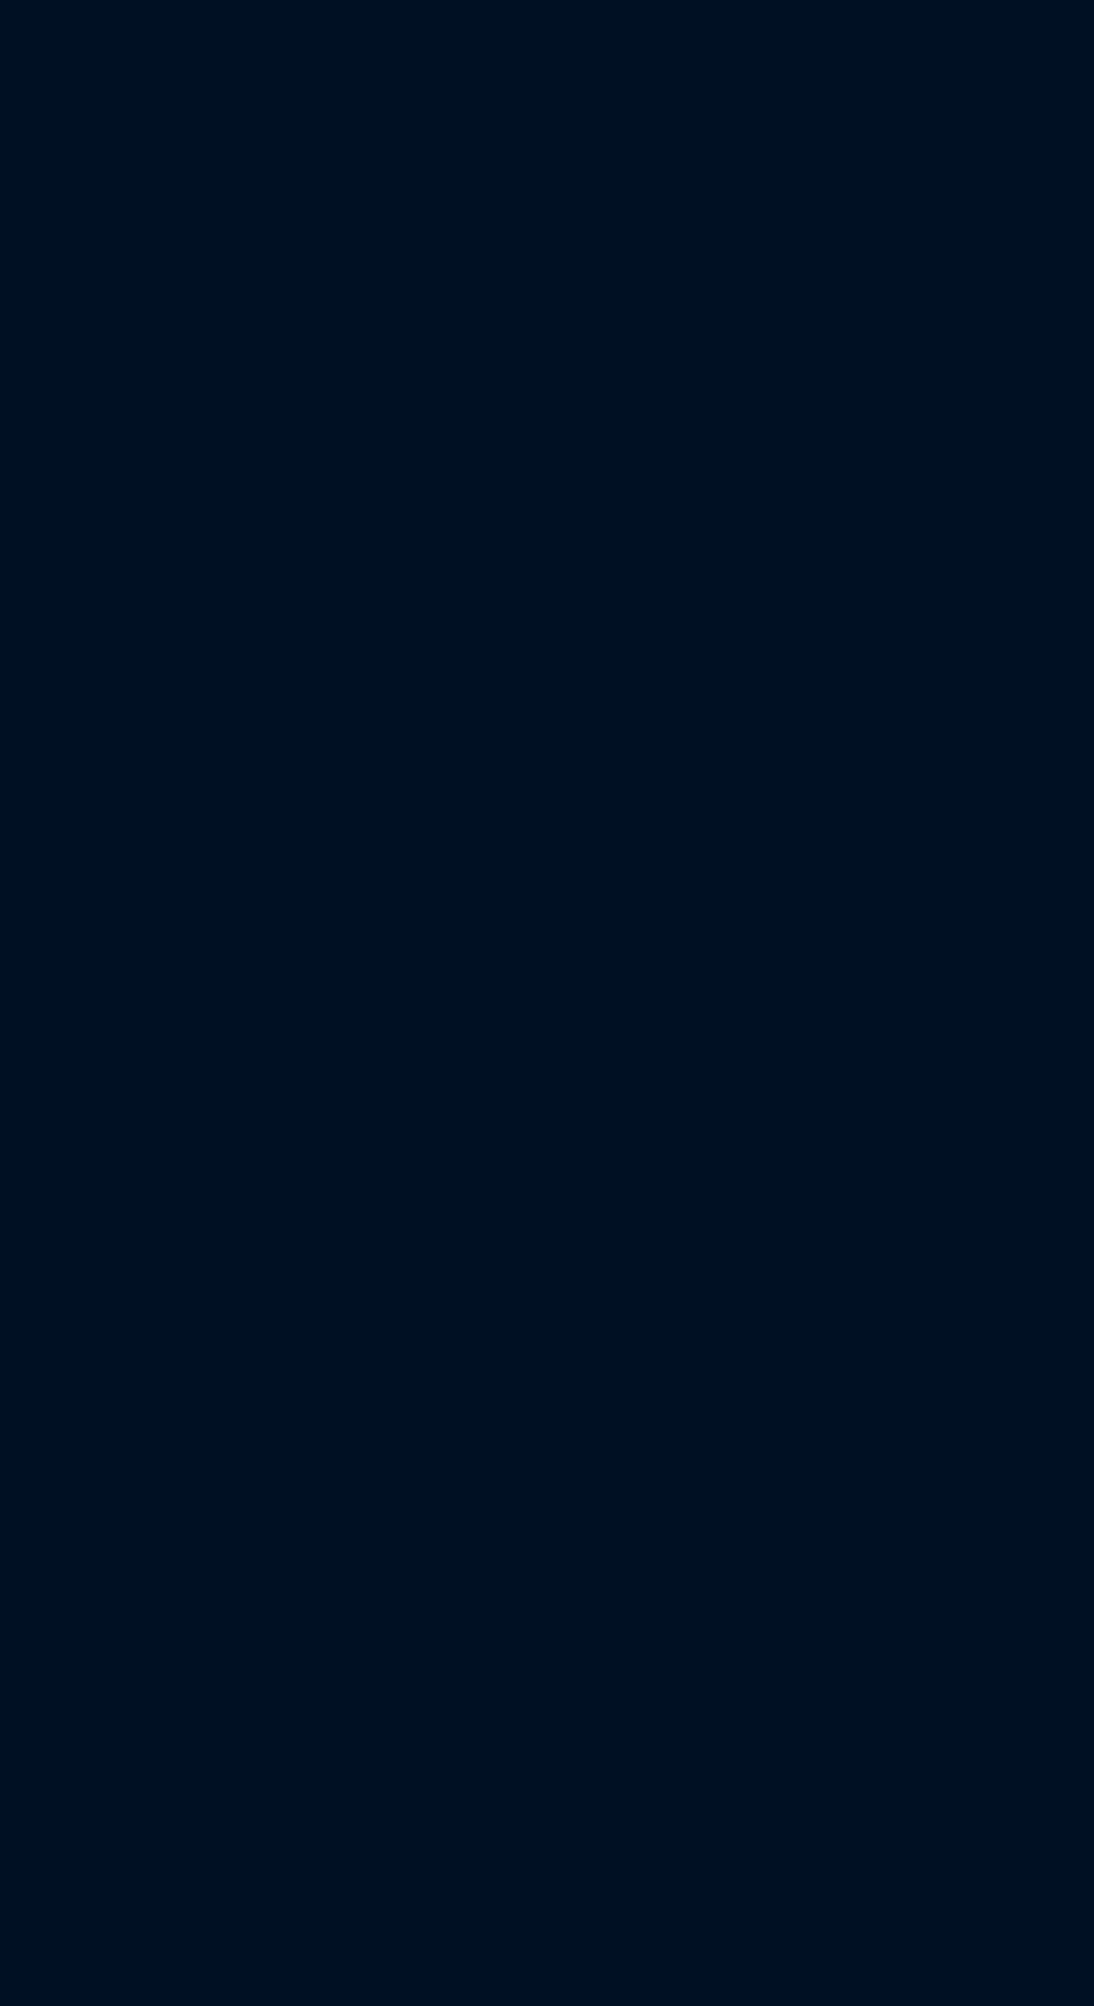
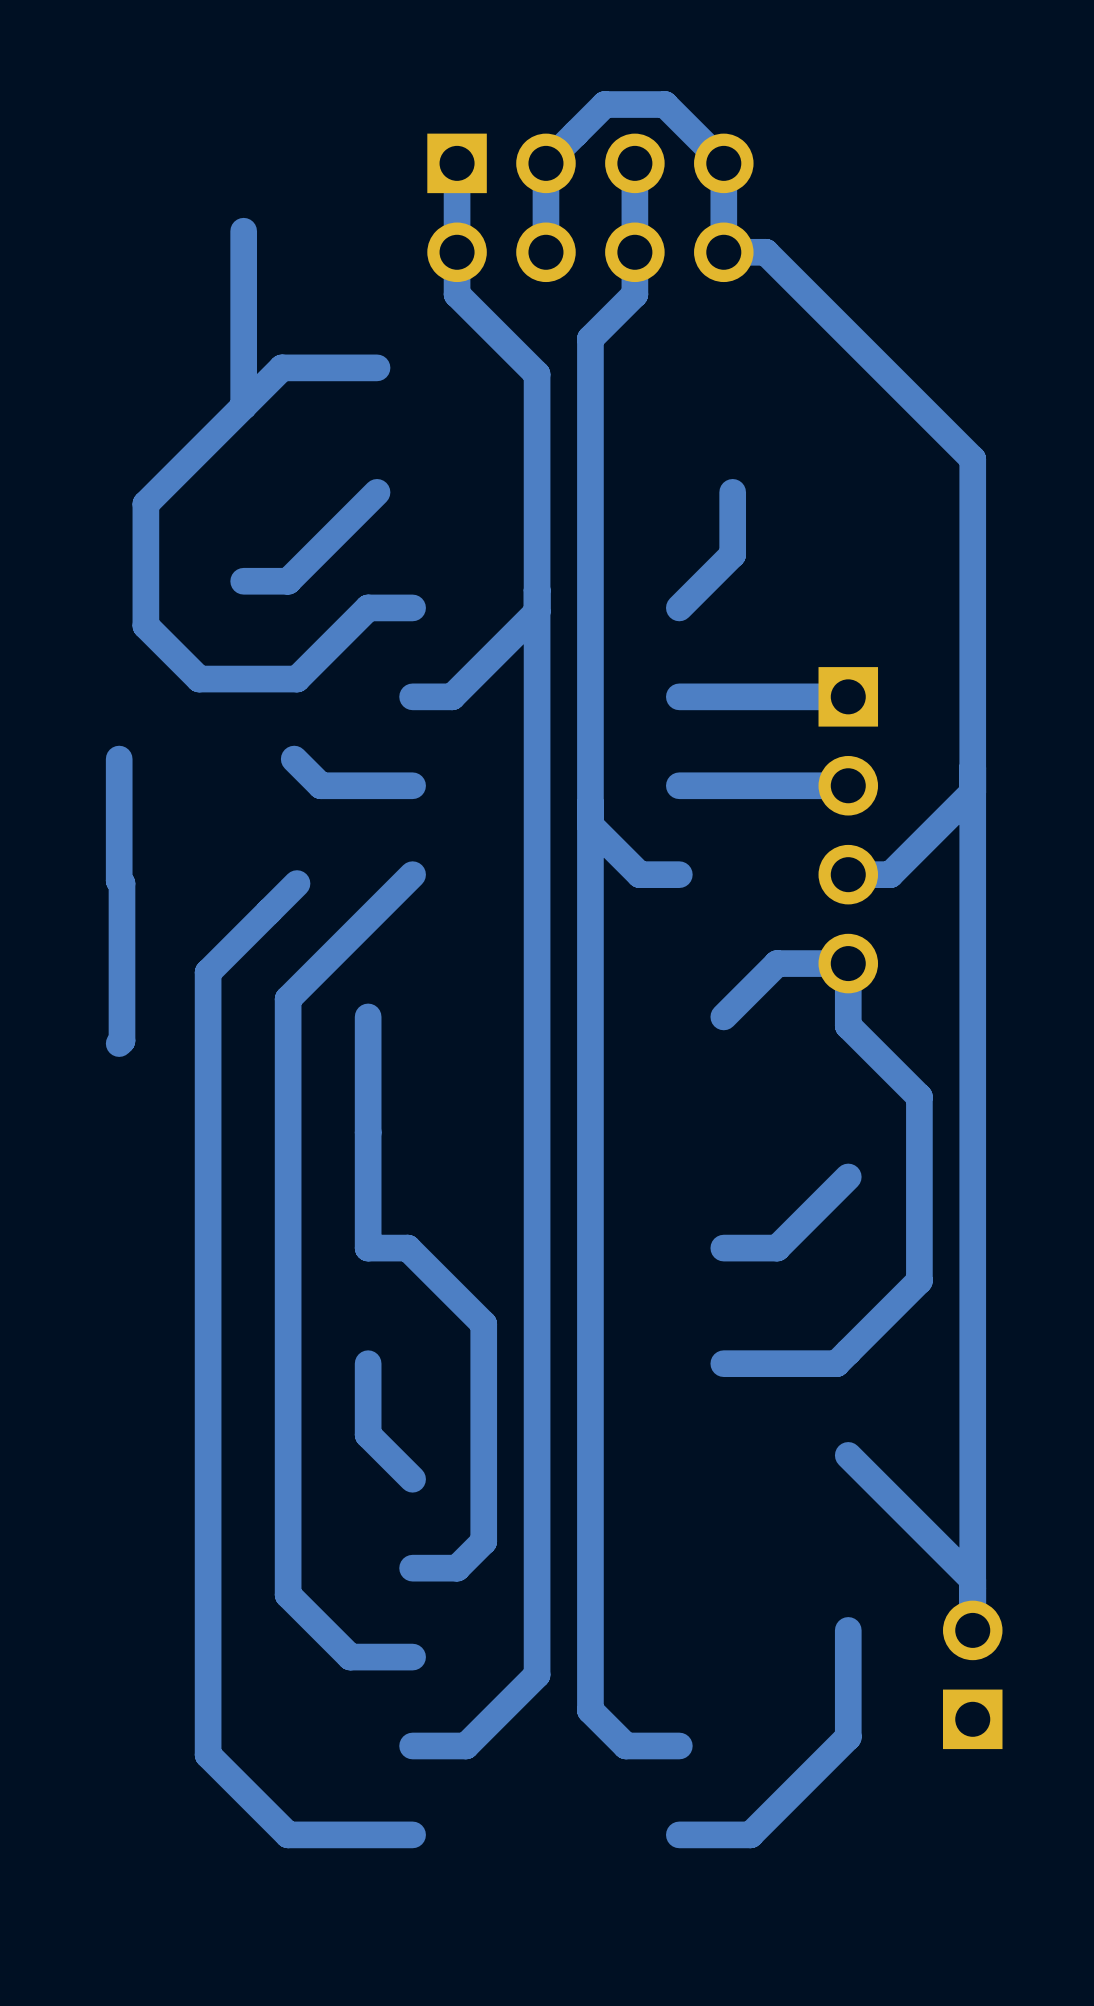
track: none -> (457, 163) (457, 294) (537, 374) (537, 1674) (465, 1745) (412, 1745)
track: none -> (634, 163) (634, 294) (590, 338) (590, 1710) (625, 1745) (679, 1745)
part: none -> (590, 207)
track: none -> (243, 231) (243, 406)
track: none -> (545, 252) (545, 163) (604, 104) (664, 104) (723, 163) (723, 252) (765, 252) (972, 459) (972, 1630)
track: none -> (377, 367) (282, 367) (145, 504) (145, 625) (199, 679) (297, 679) (368, 607) (412, 607)
track: none -> (377, 492) (288, 581) (243, 581)
track: none -> (732, 492) (732, 554) (679, 607)
track: none -> (537, 611) (452, 696) (412, 696)
track: none -> (848, 696) (679, 696)
track: none -> (119, 759) (119, 880) (122, 883) (122, 1040) (119, 1043)
track: none -> (294, 759) (320, 785) (412, 785)
track: none -> (848, 785) (679, 785)
track: none -> (972, 792) (890, 874) (848, 874)
track: none -> (590, 825) (639, 874) (679, 874)
part: none -> (848, 830)
track: none -> (412, 874) (288, 999) (288, 1594) (350, 1657) (412, 1657)
track: none -> (297, 883) (208, 972) (208, 1754) (288, 1834) (412, 1834)
track: none -> (368, 1016) (368, 1248) (407, 1248) (483, 1324) (483, 1541) (457, 1568) (412, 1568)
track: none -> (723, 1016) (777, 963) (848, 963) (848, 1025) (919, 1096) (919, 1280) (836, 1363) (723, 1363)
track: none -> (848, 1176) (777, 1248) (723, 1248)
track: none -> (368, 1363) (368, 1434) (412, 1479)
track: none -> (848, 1455) (972, 1579)
track: none -> (848, 1630) (848, 1737) (750, 1834) (679, 1834)
part: none -> (972, 1674)

